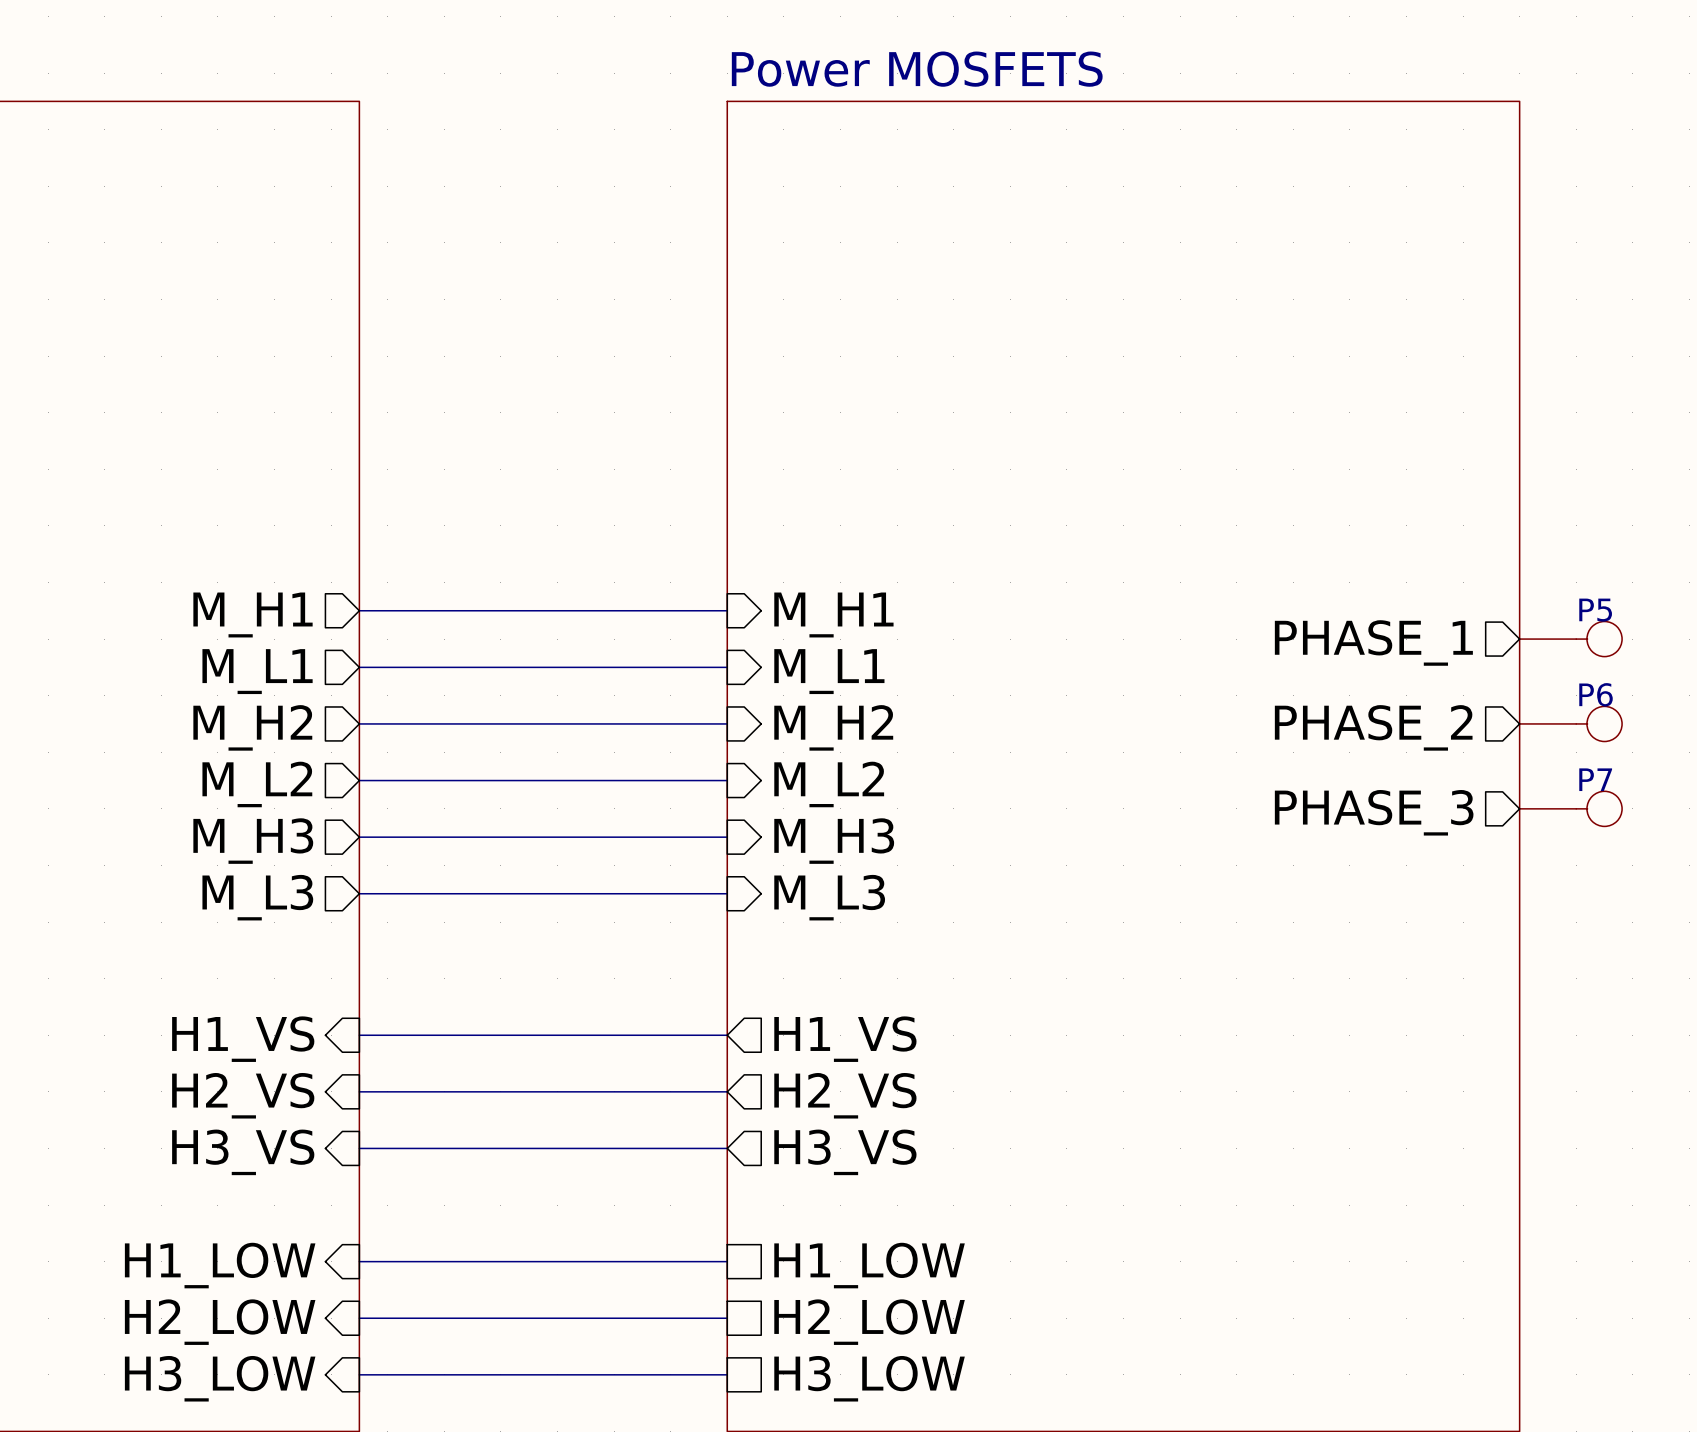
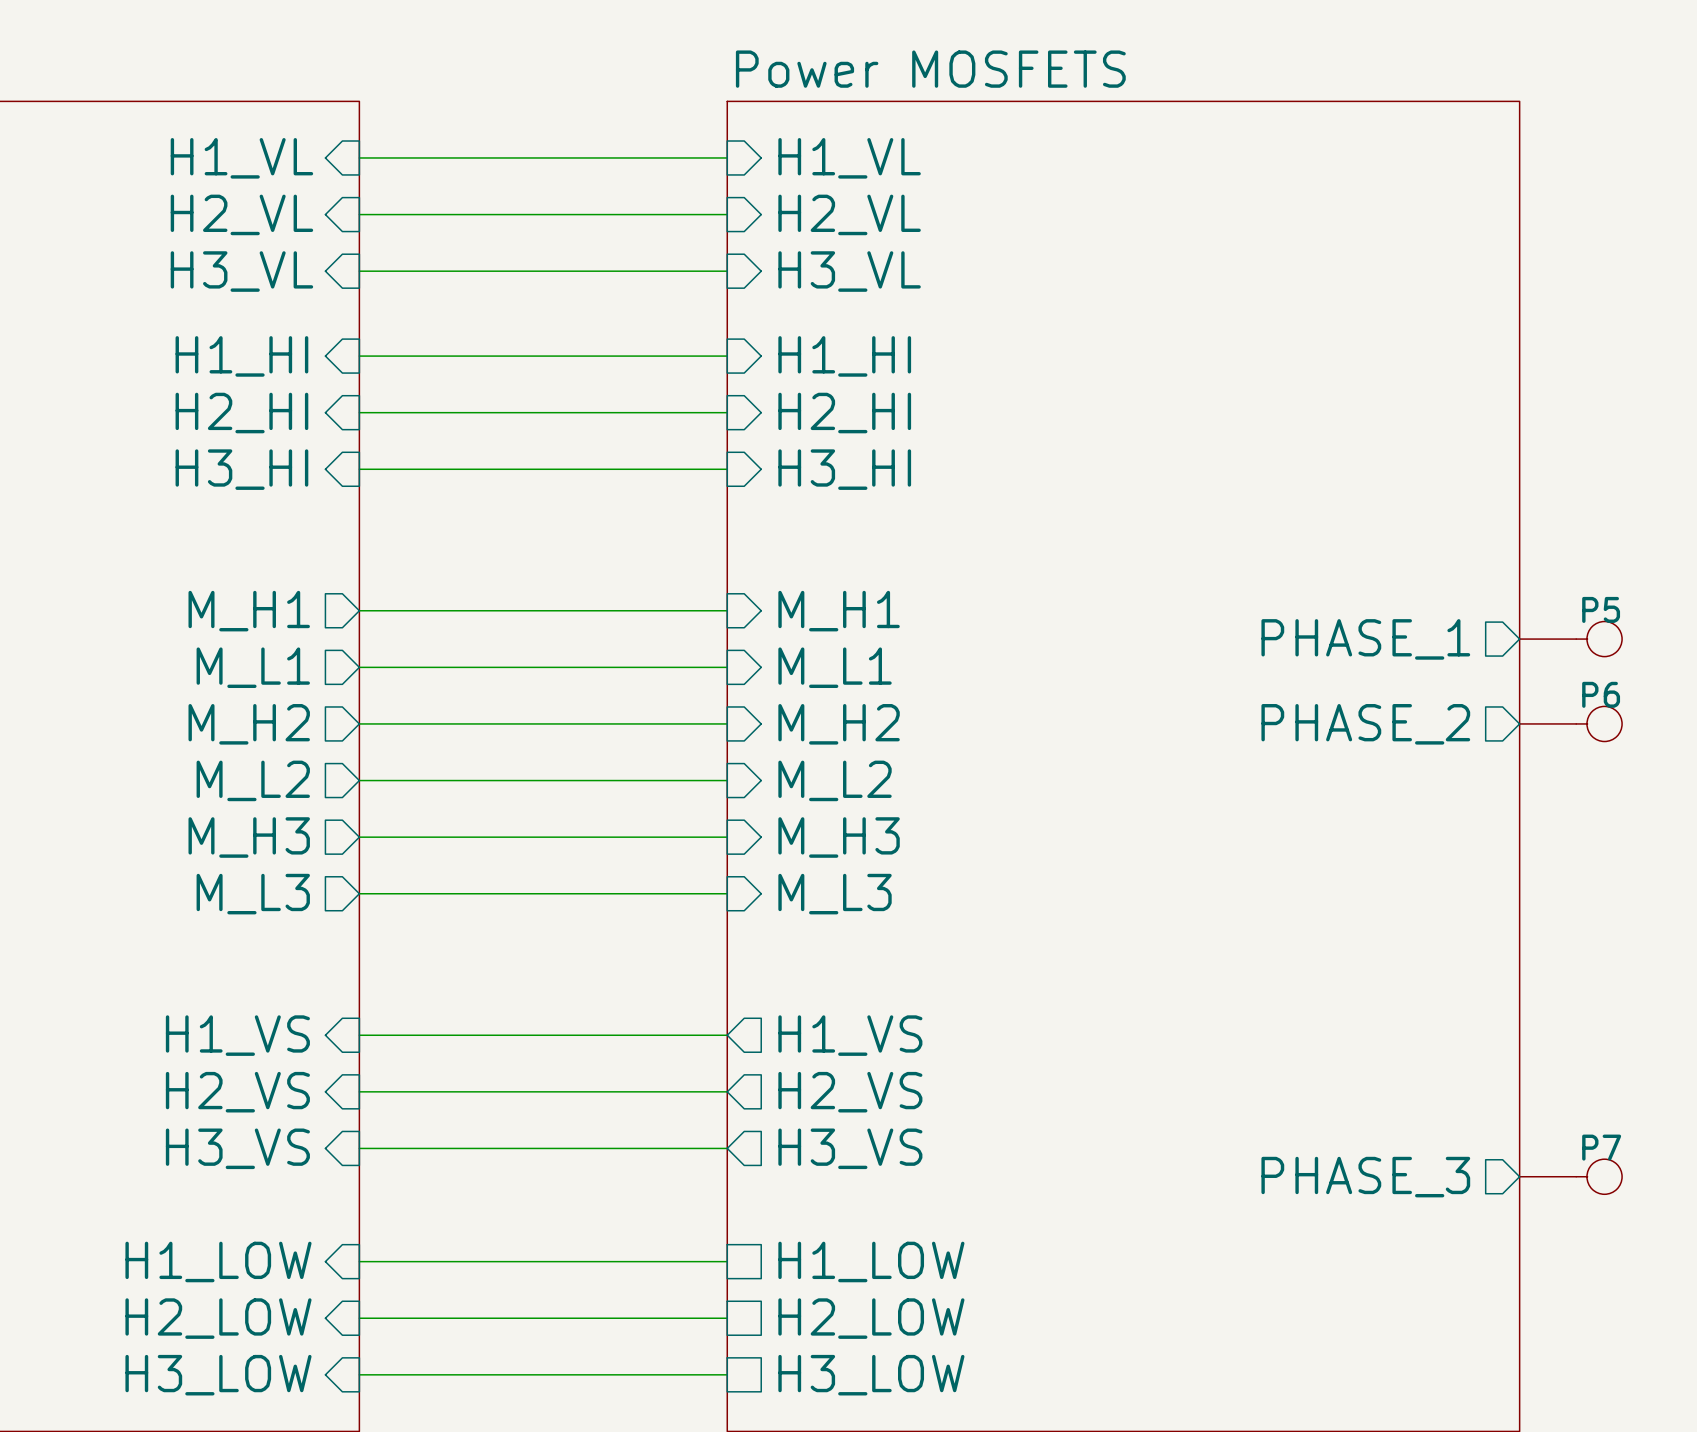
wire: none -> (359, 157) (727, 157)
sheet pin: none -> H1_VL (241, 158)
sheet pin: none -> H1_VL (849, 158)
wire: none -> (359, 214) (727, 214)
sheet pin: none -> H2_VL (241, 214)
sheet pin: none -> H2_VL (849, 214)
wire: none -> (359, 271) (727, 271)
sheet pin: none -> H3_VL (241, 271)
sheet pin: none -> H3_VL (849, 271)
wire: none -> (359, 356) (727, 356)
sheet pin: none -> H1_HI (241, 356)
sheet pin: none -> H1_HI (844, 356)
wire: none -> (359, 412) (727, 412)
sheet pin: none -> H2_HI (241, 413)
sheet pin: none -> H2_HI (844, 413)
wire: none -> (359, 469) (727, 469)
sheet pin: none -> H3_HI (241, 469)
sheet pin: none -> H3_HI (844, 469)
P7 position: (1570, 808) -> (1570, 1176)
sheet pin position: PHASE_3 (1374, 812) -> PHASE_3 (1365, 1177)

